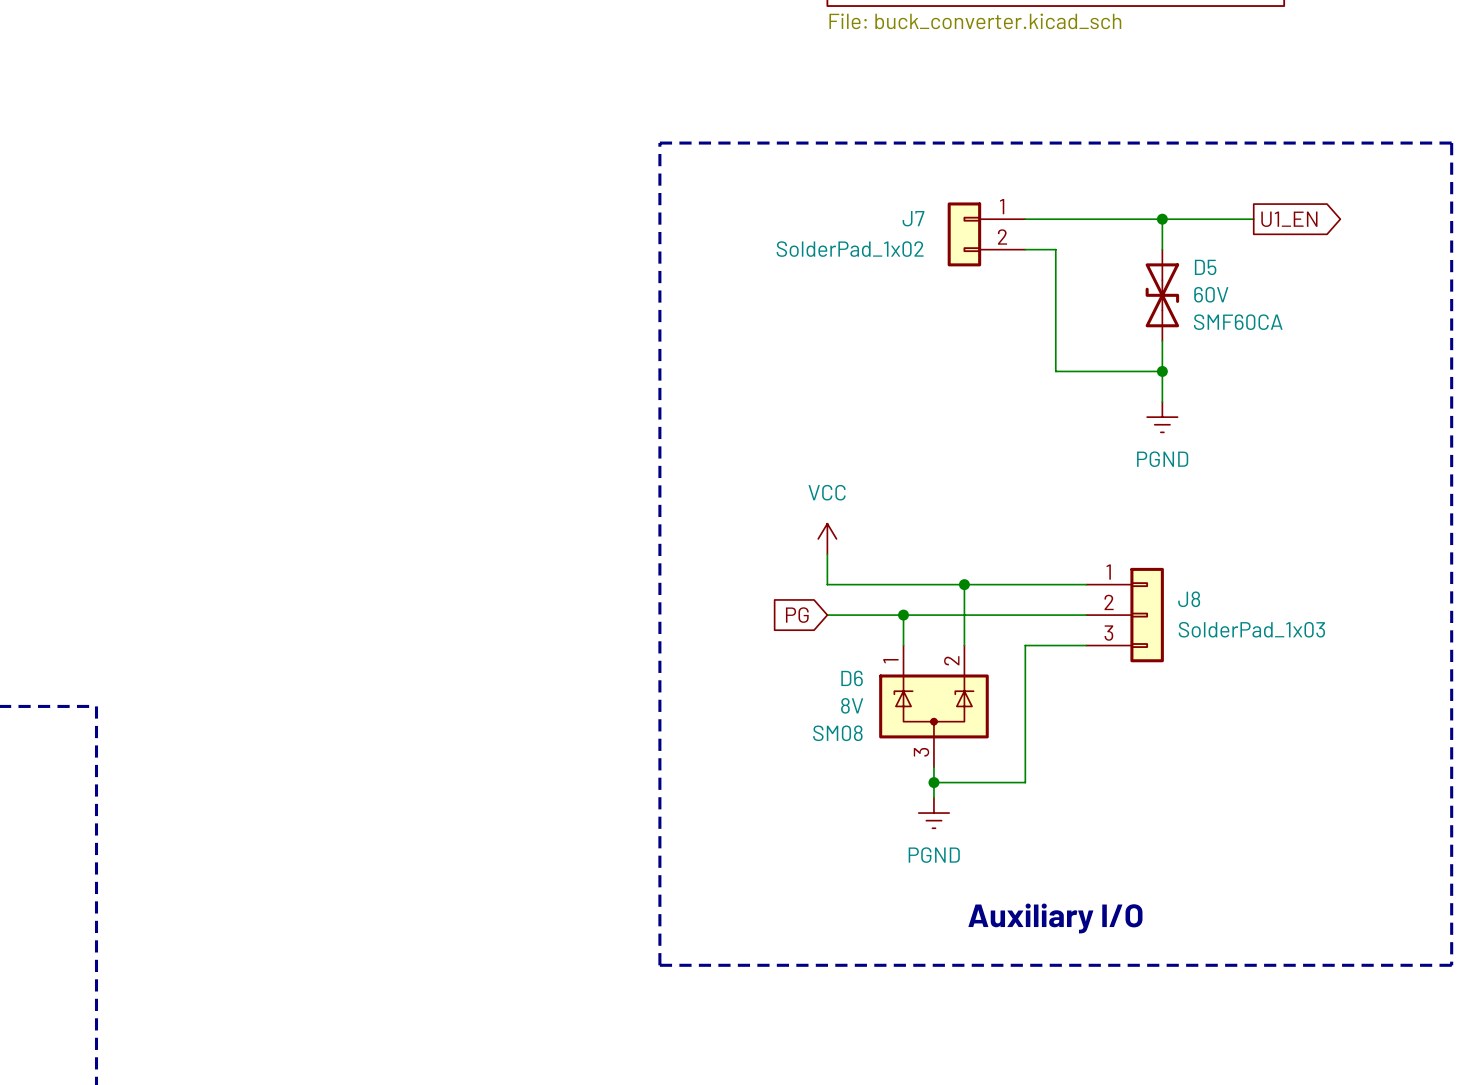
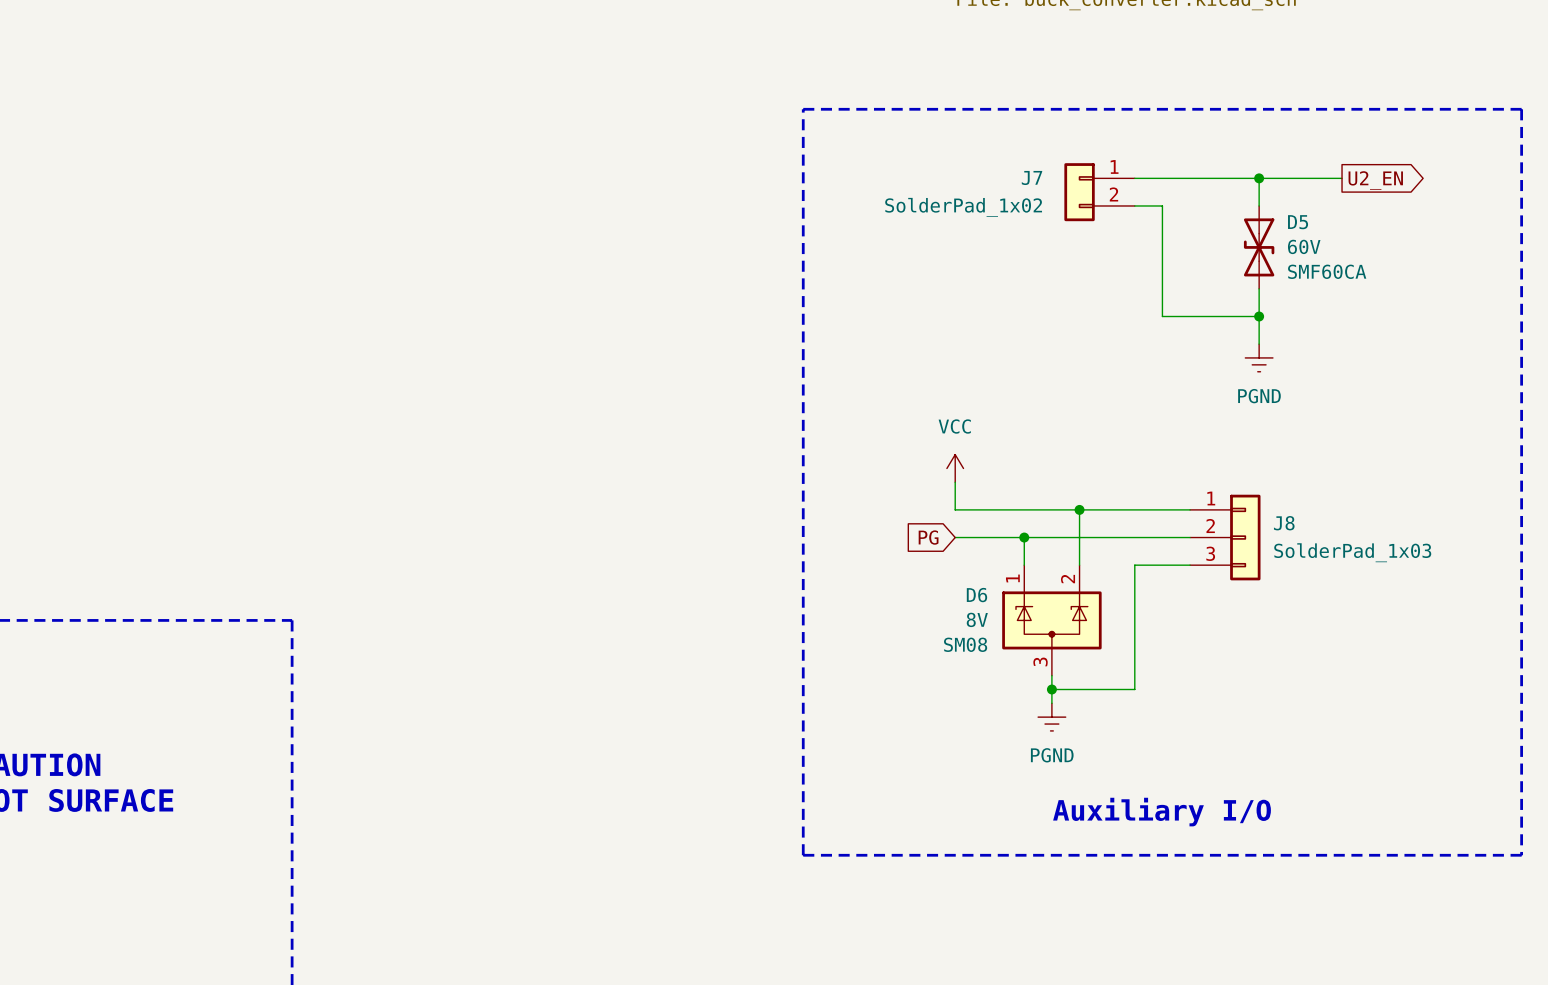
global label: U1_EN (1289, 219) -> U2_EN (1375, 180)

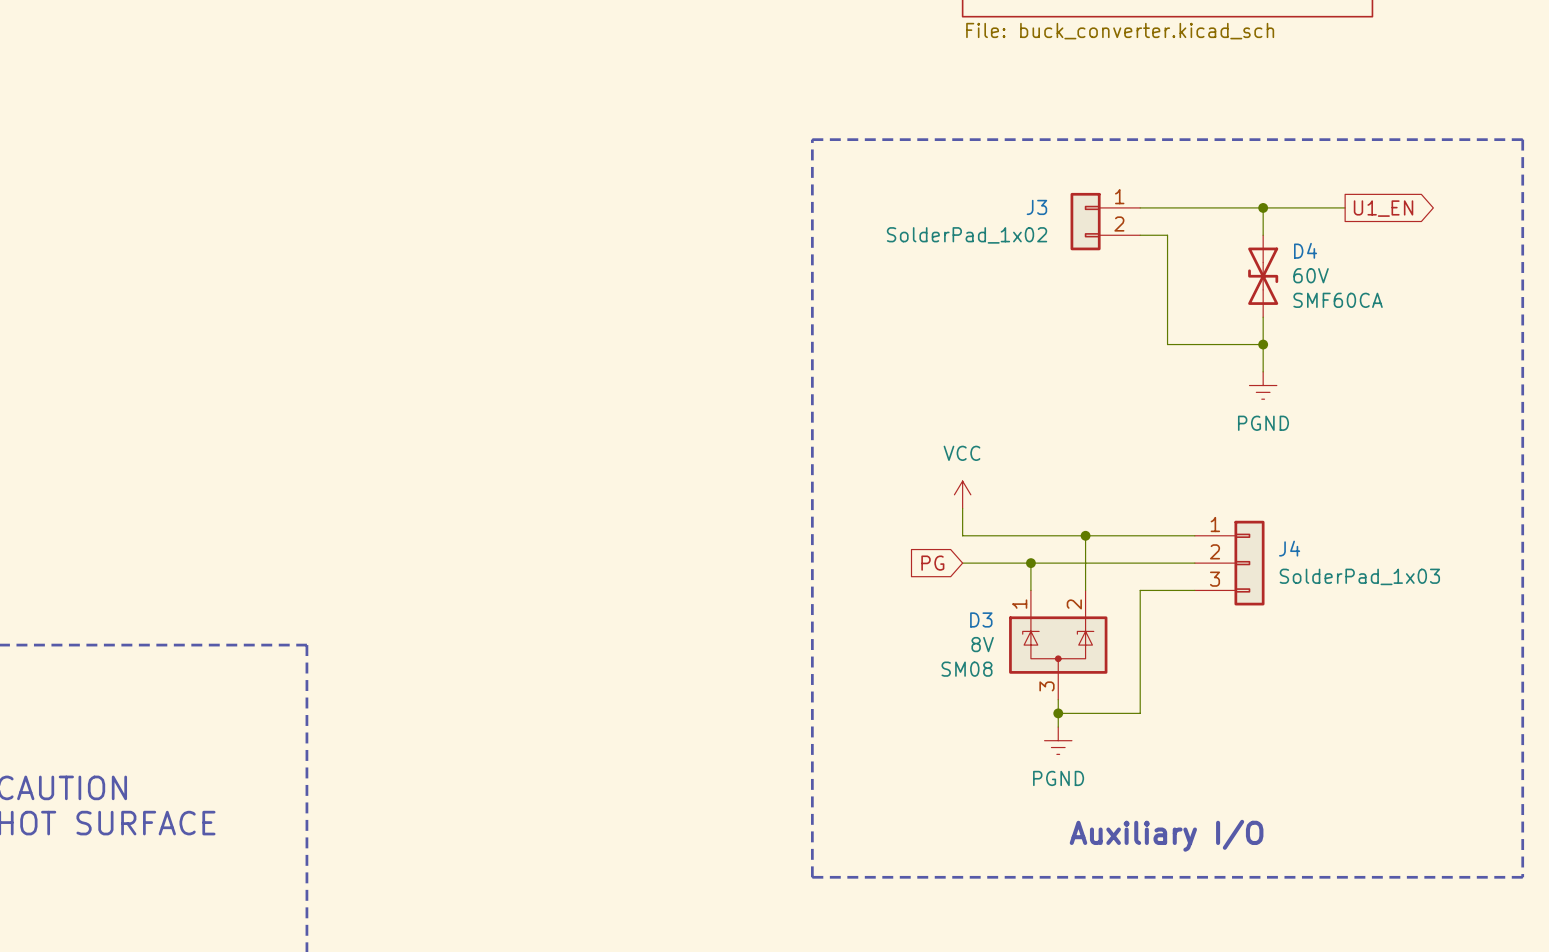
J7 name: J7 (1032, 177) -> J3 (1036, 207)
global label: U2_EN (1375, 180) -> U1_EN (1383, 208)
D5 name: D5 (1298, 222) -> D4 (1305, 250)
J8 name: J8 (1284, 523) -> J4 (1289, 548)
D6 name: D6 (976, 595) -> D3 (981, 619)

